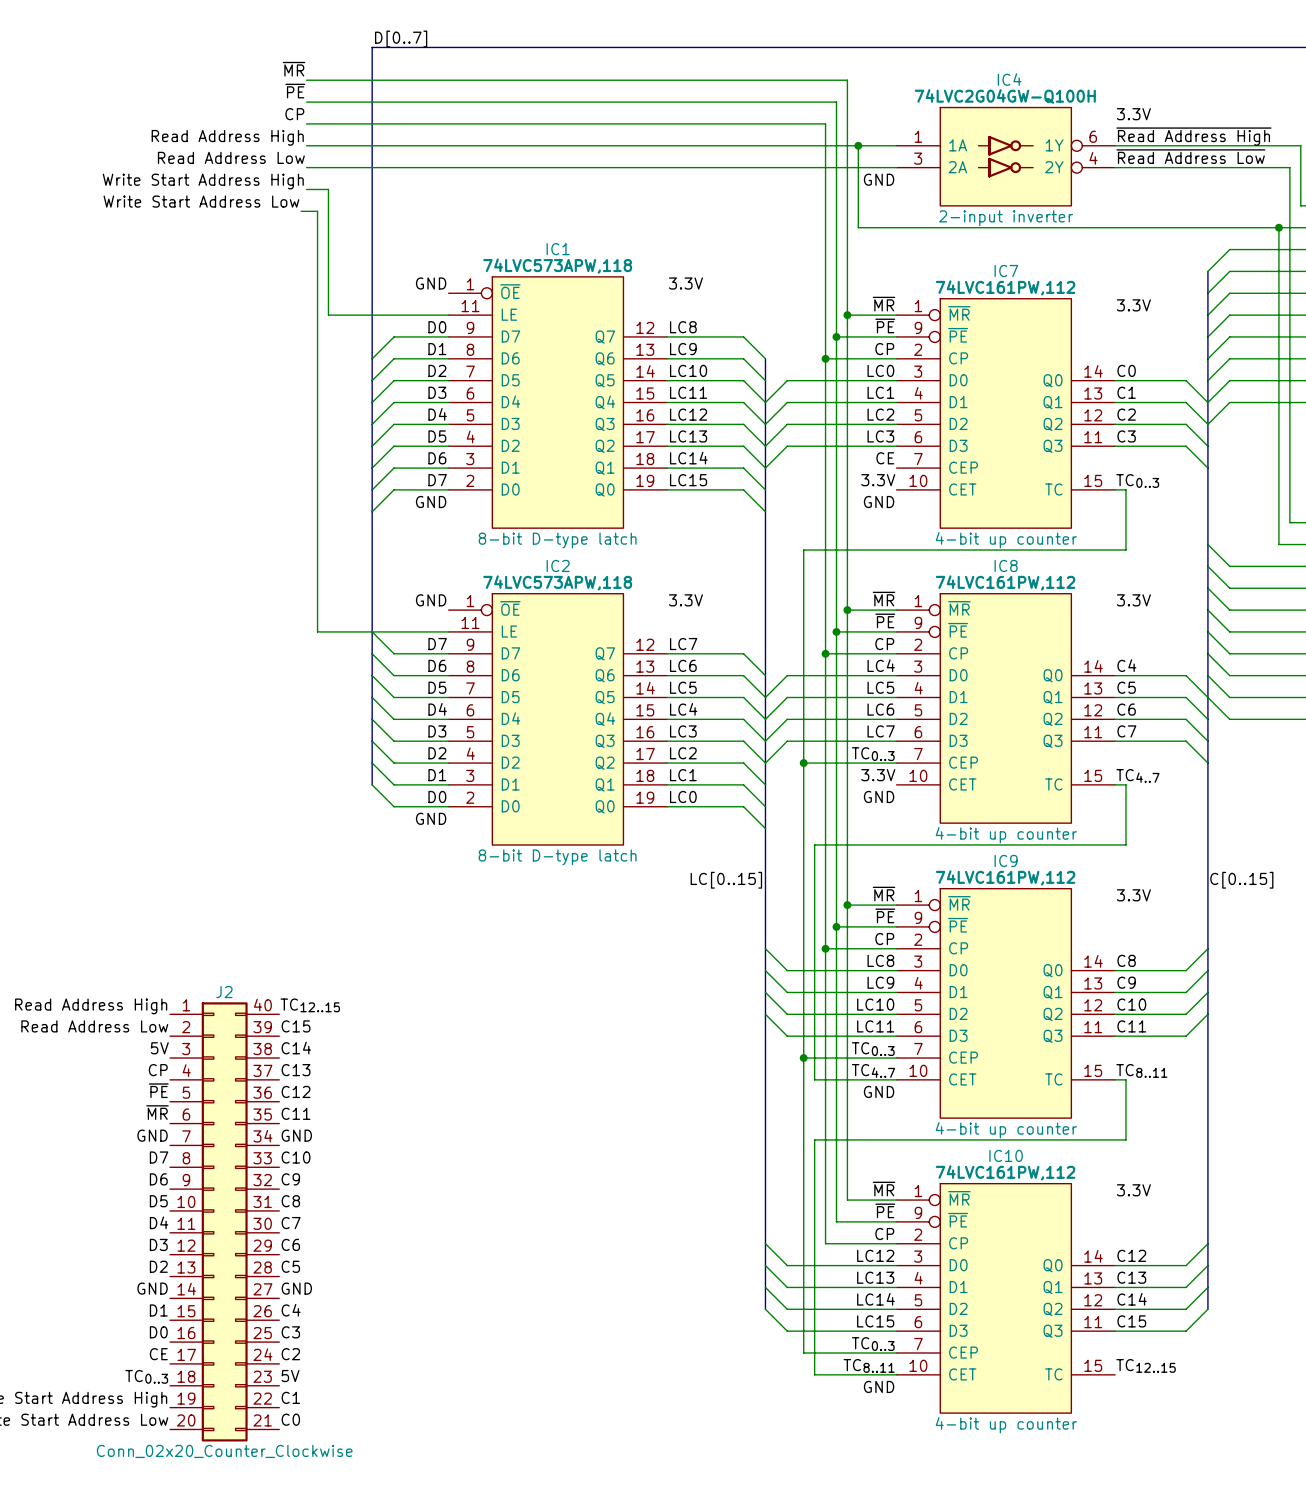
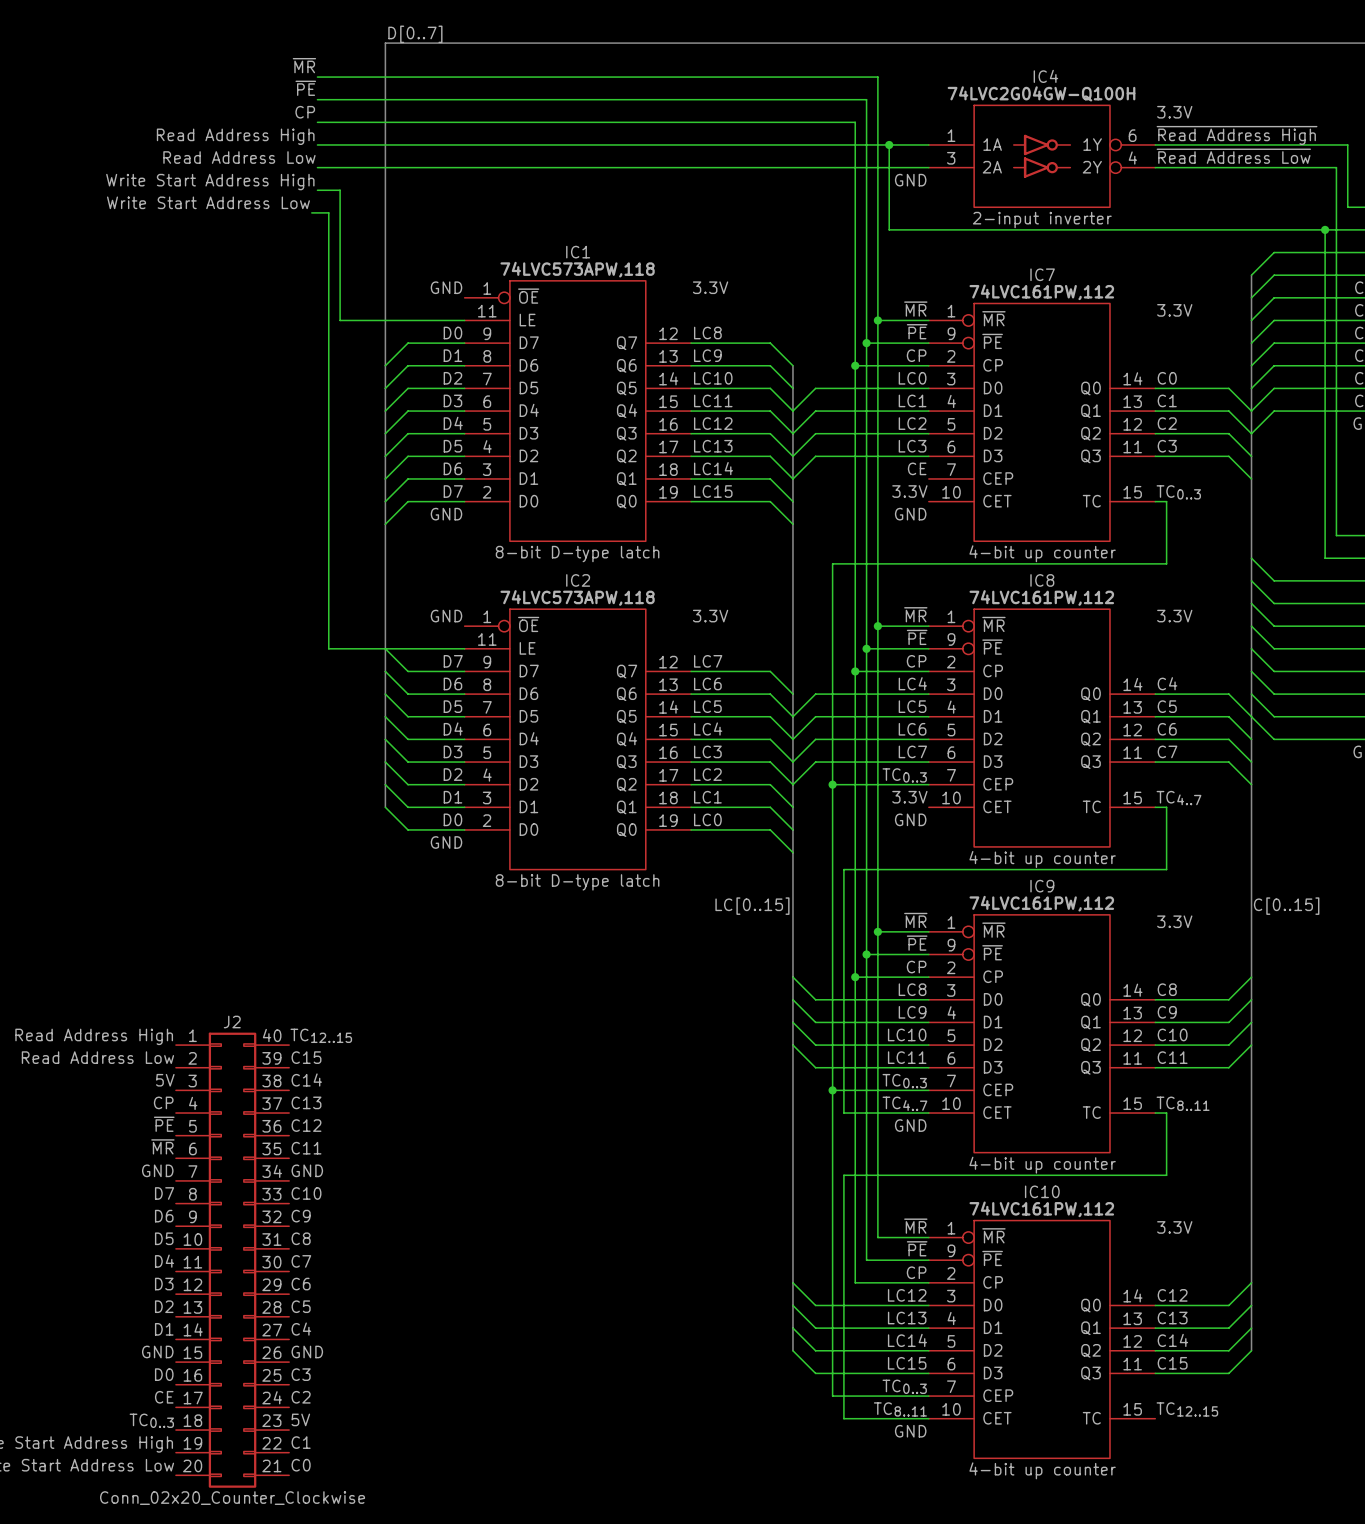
label: GND (152, 1288) -> D1 (164, 1329)
label: GND (296, 1288) -> C4 (301, 1329)
label: D1 (158, 1310) -> GND (157, 1351)
label: C4 (291, 1310) -> GND (307, 1351)

